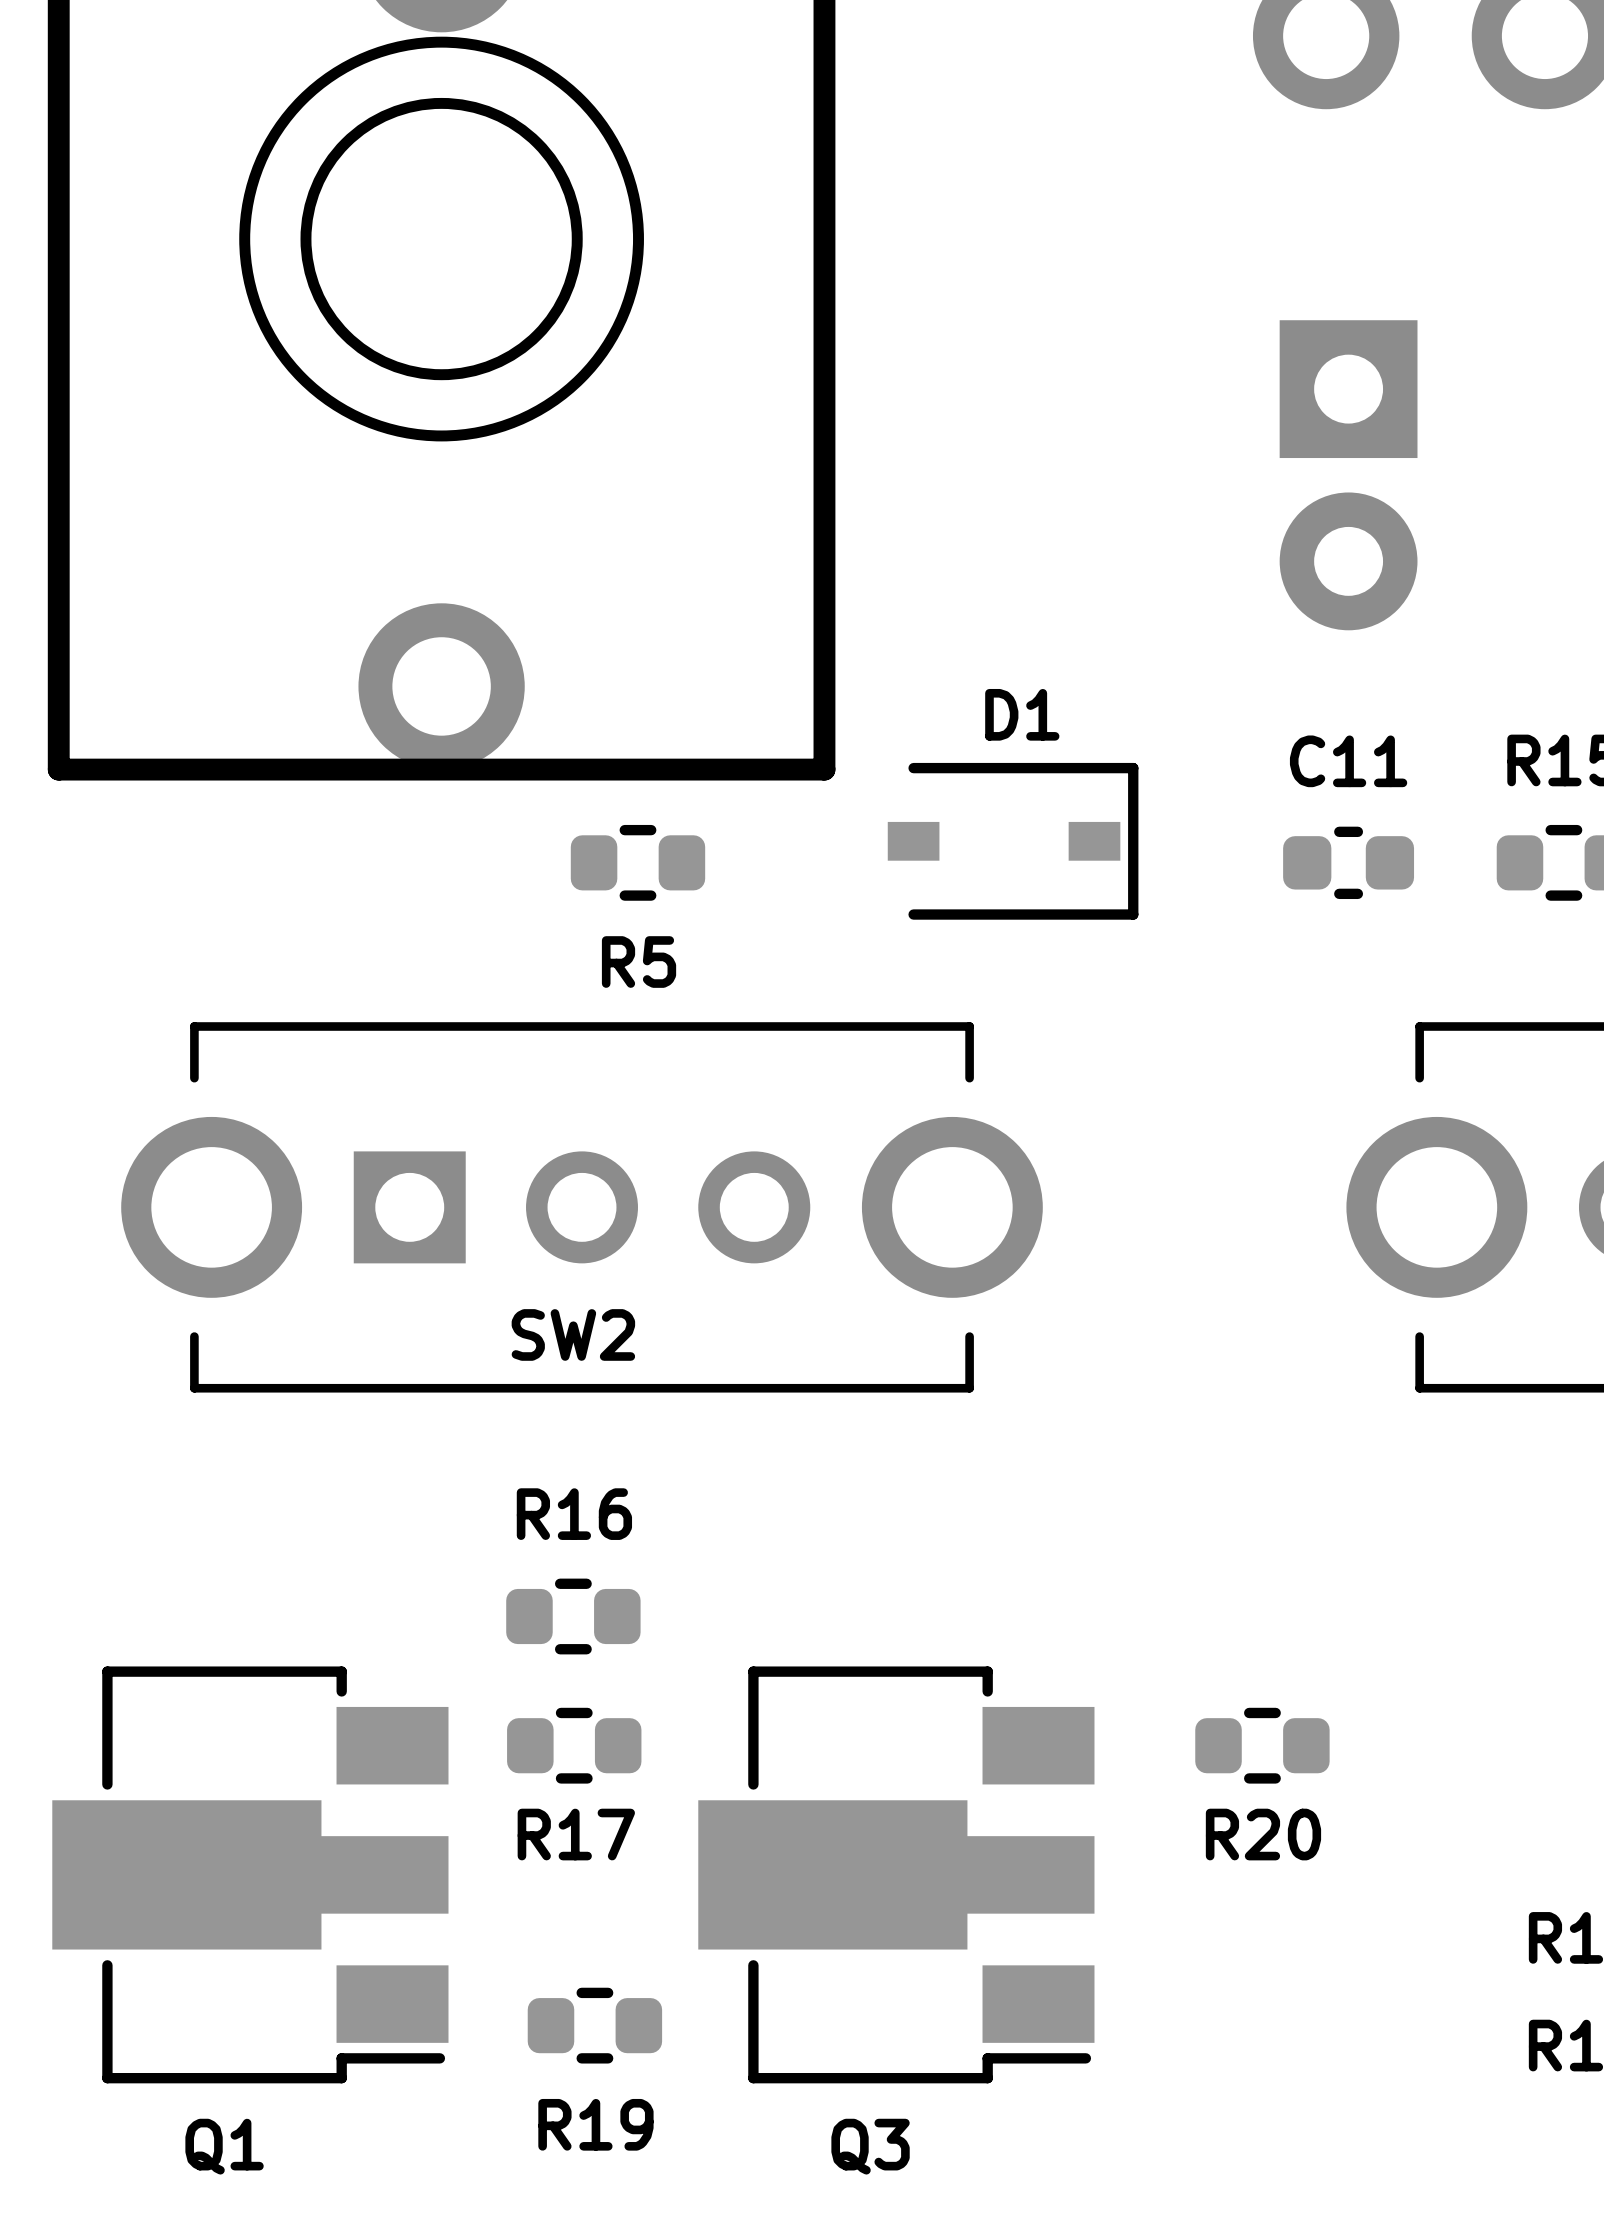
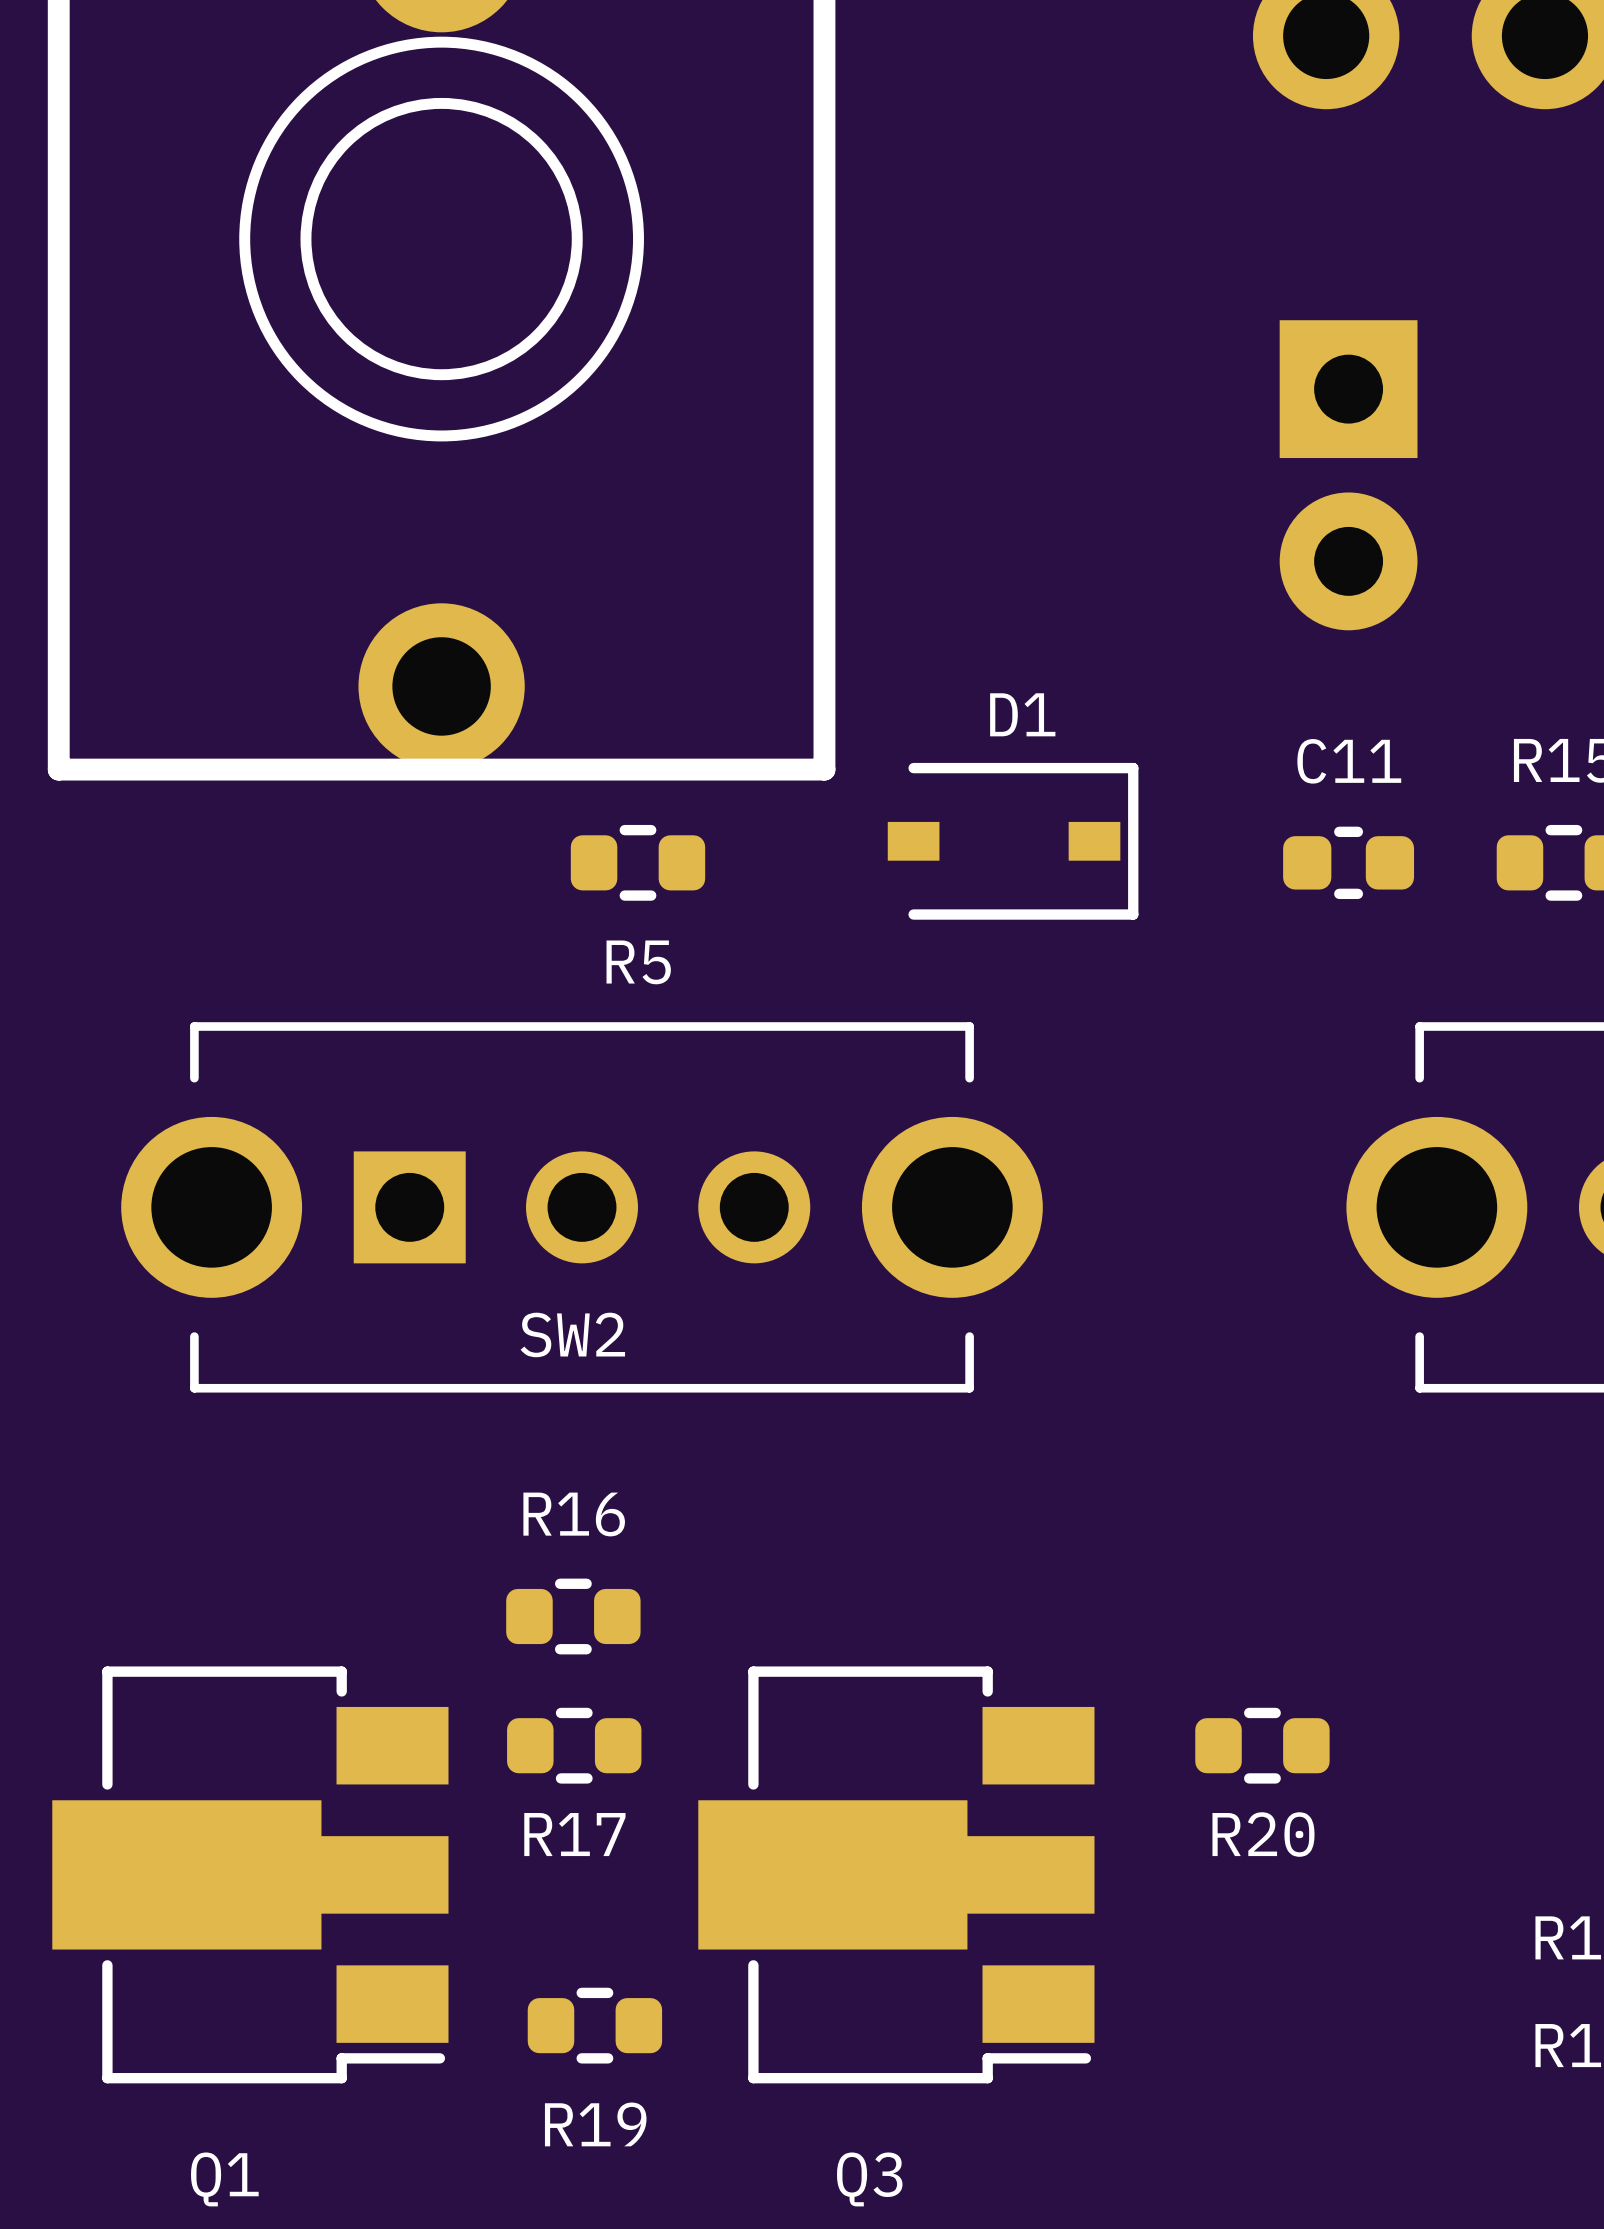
Q1 name position: Q1 (224, 2146) -> Q1 (224, 2179)
Q3 name position: Q3 (870, 2146) -> Q3 (869, 2179)

